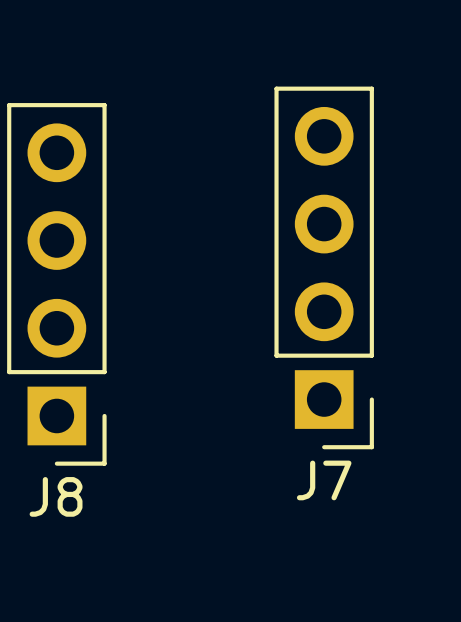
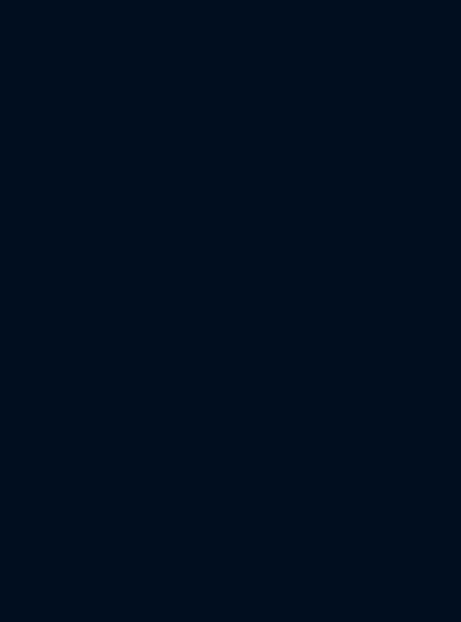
J7: (324, 267) -> none
J8: (56, 284) -> none

